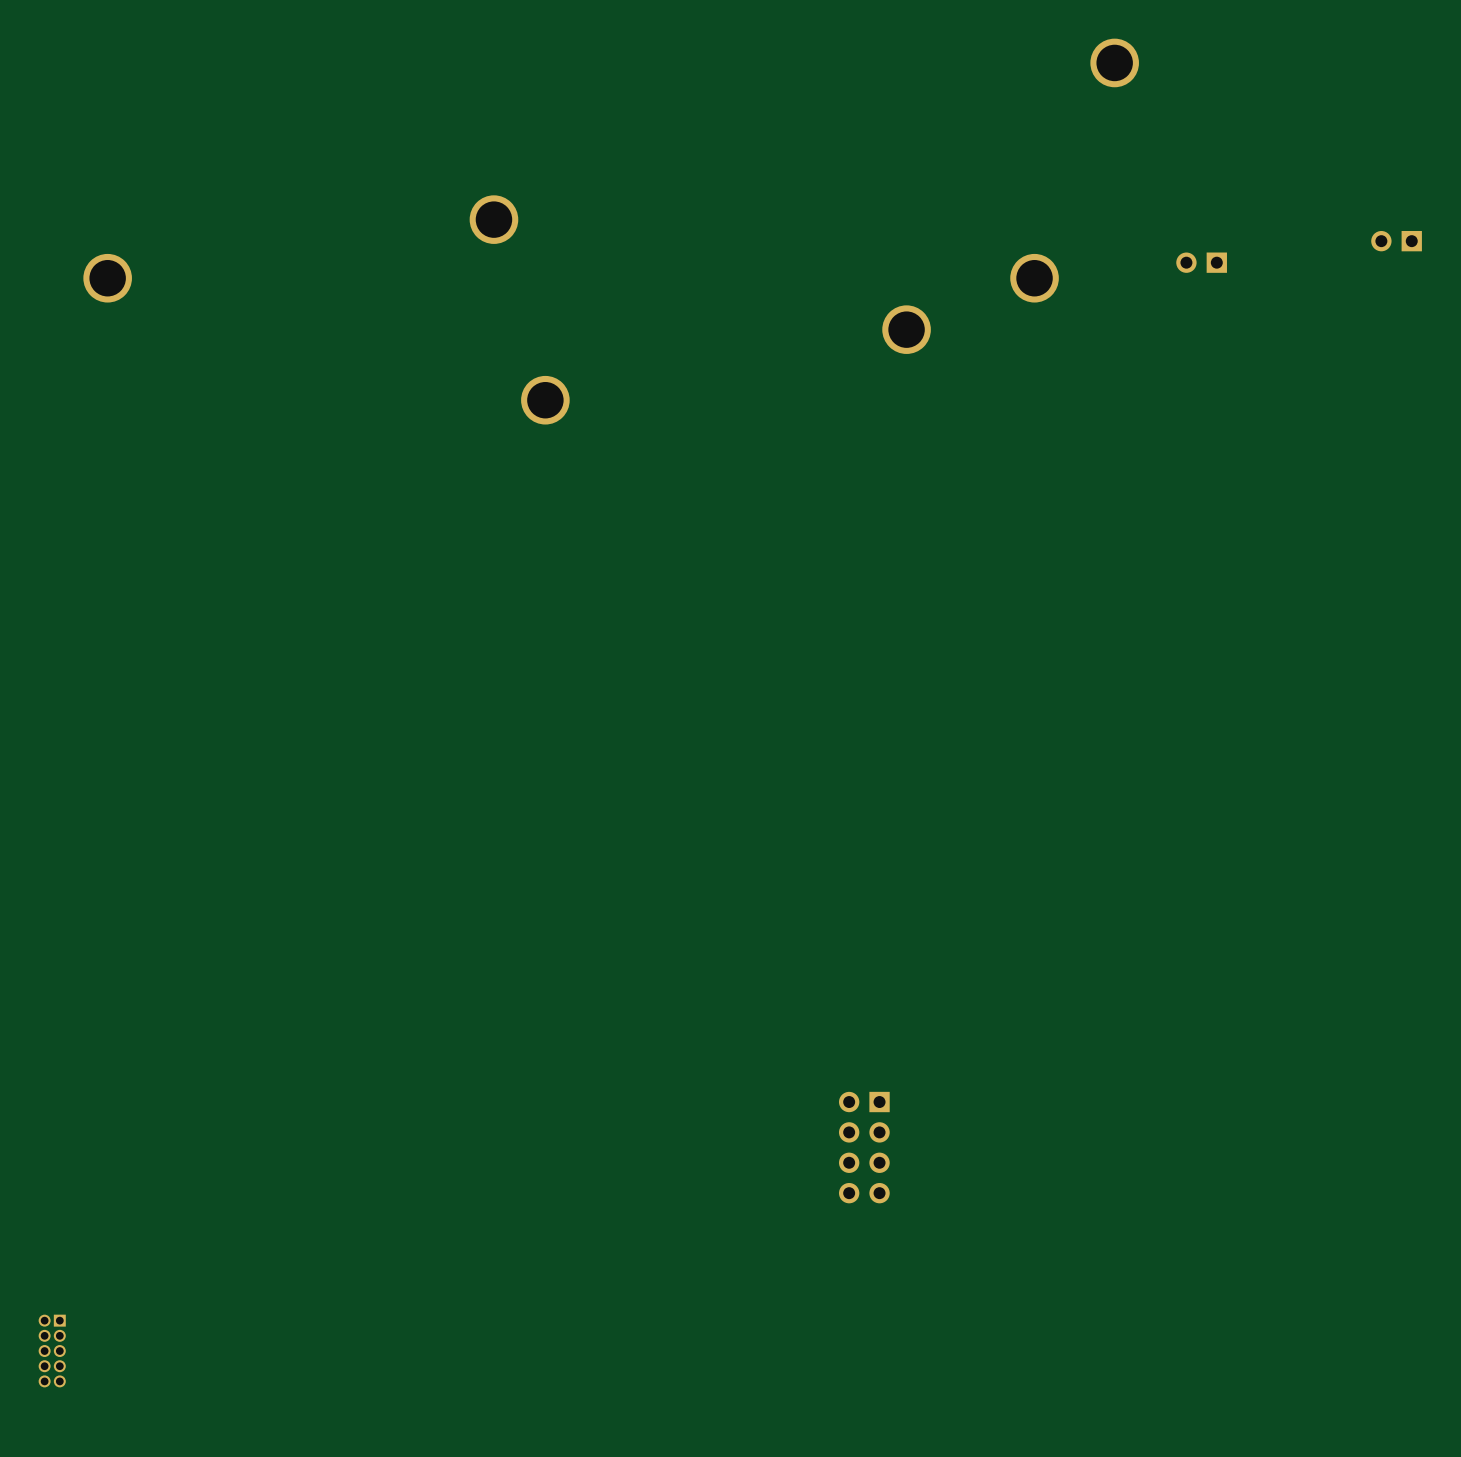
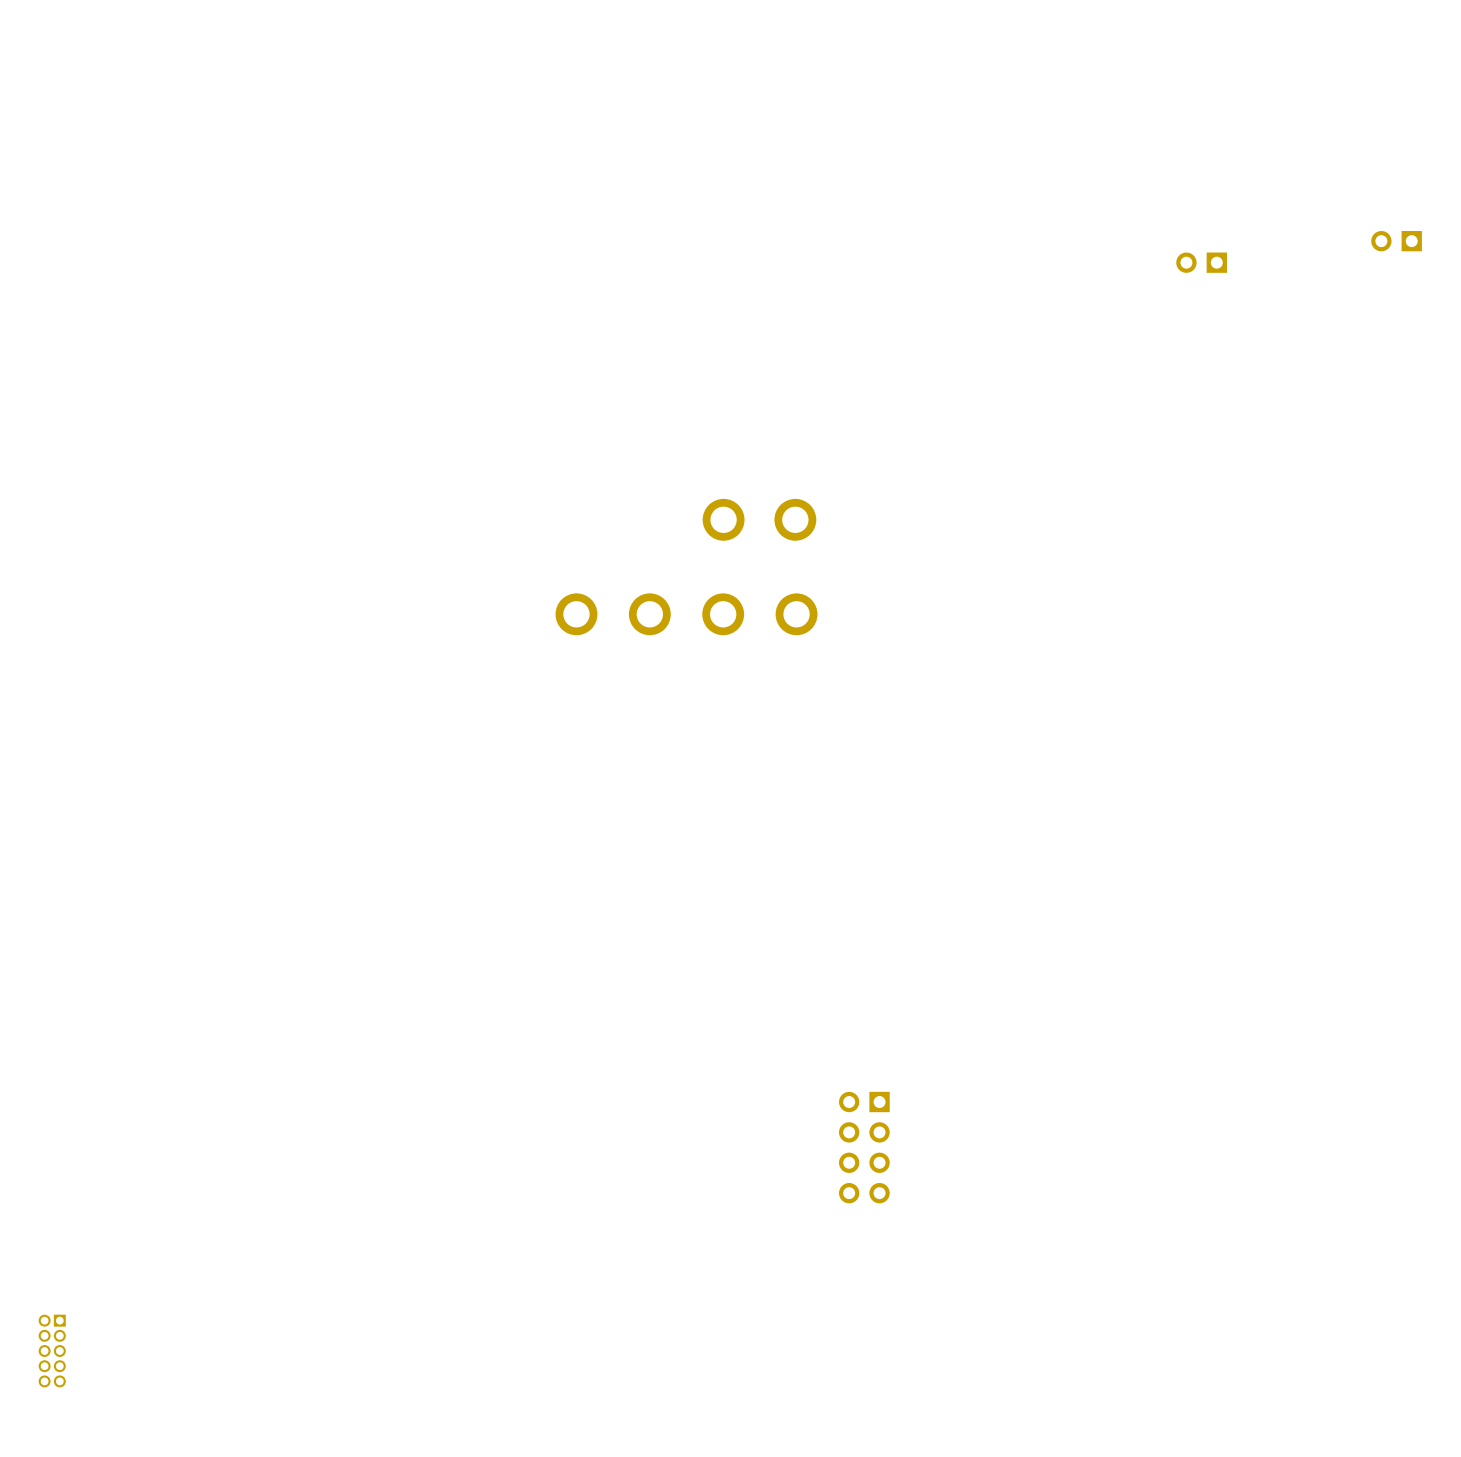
part: (1114, 62) -> none
part: (493, 219) -> none
part: (107, 278) -> none
part: (1034, 278) -> none
part: (906, 329) -> none
part: (545, 400) -> none
part: none -> (723, 519)
part: none -> (795, 519)
part: none -> (576, 614)
part: none -> (649, 614)
part: none -> (723, 614)
part: none -> (796, 614)

